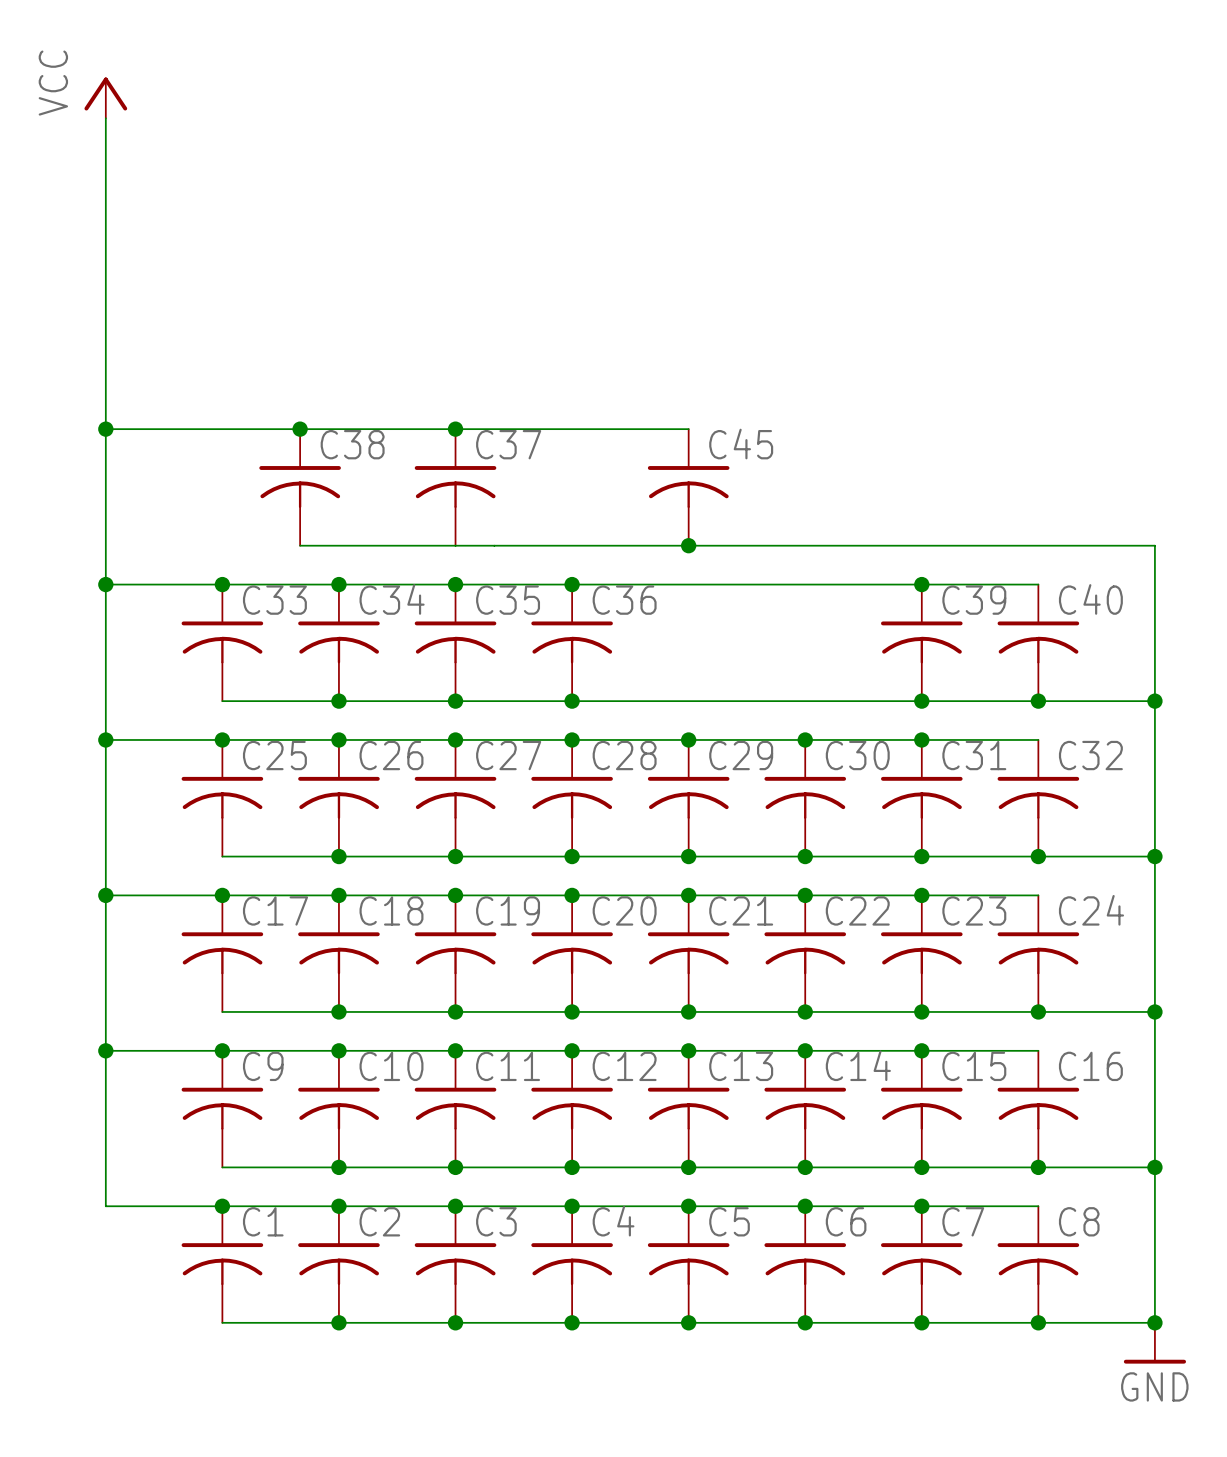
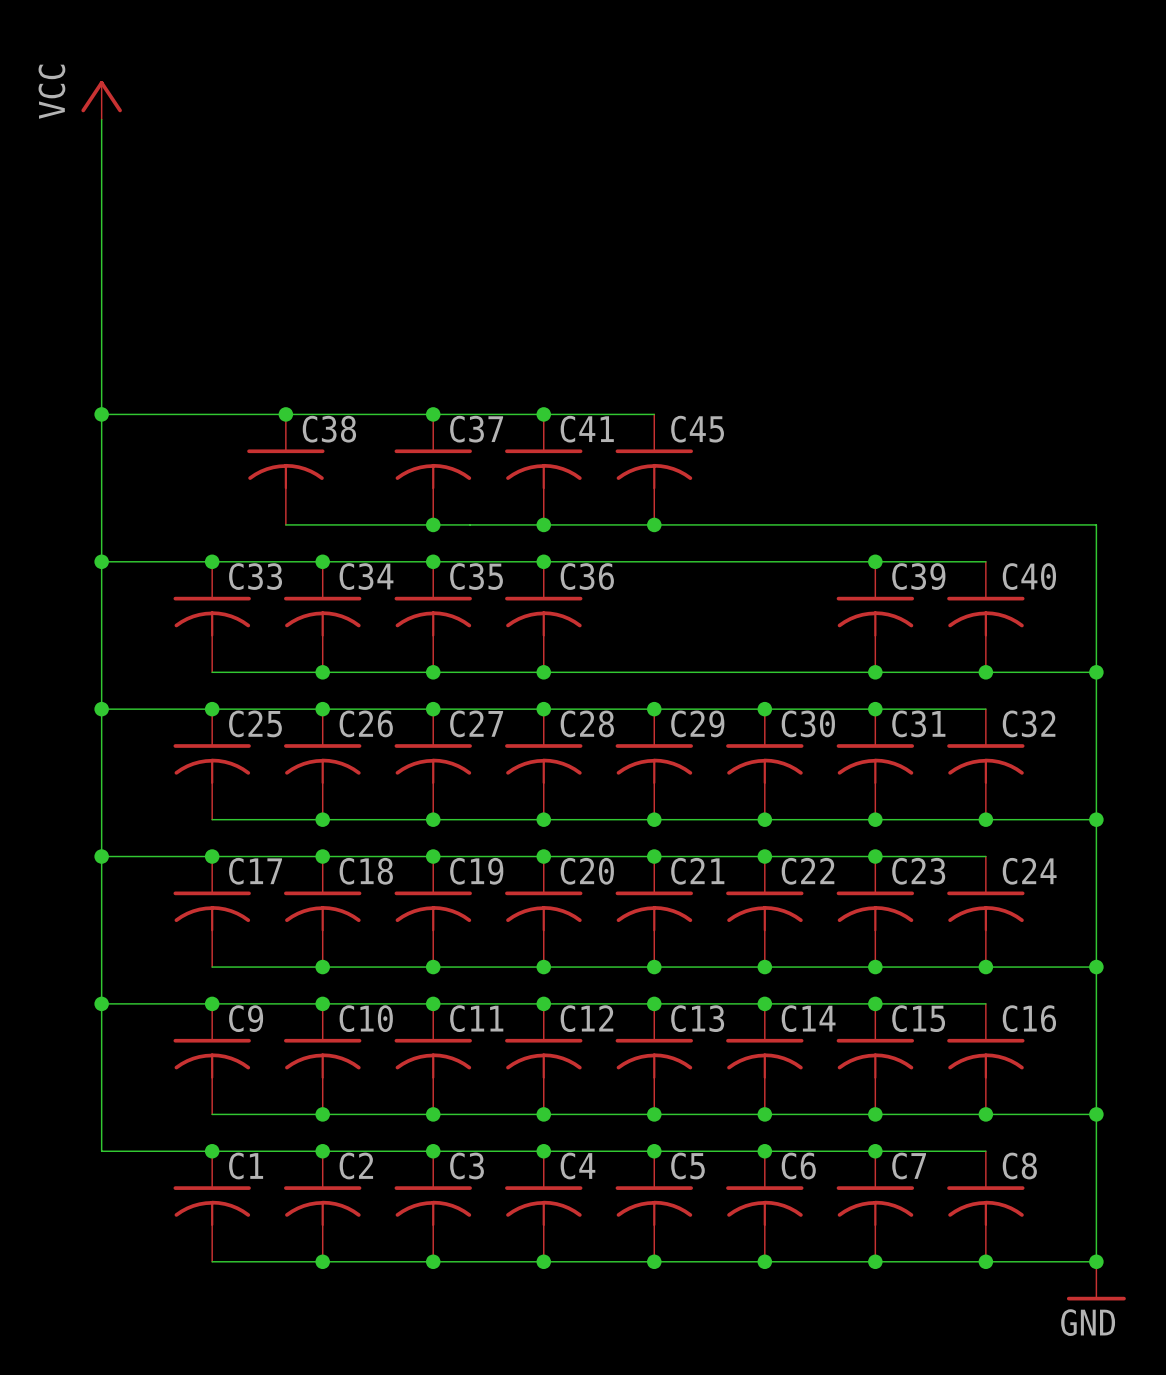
junction: none -> (543, 414)
C41: none -> (543, 469)
junction: none -> (433, 524)
junction: none -> (543, 524)

